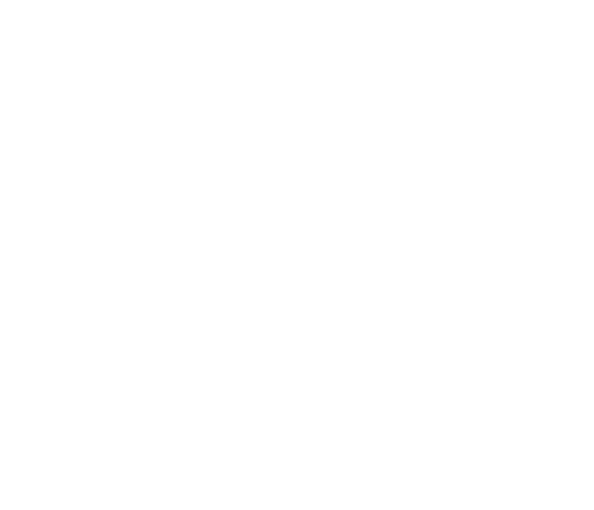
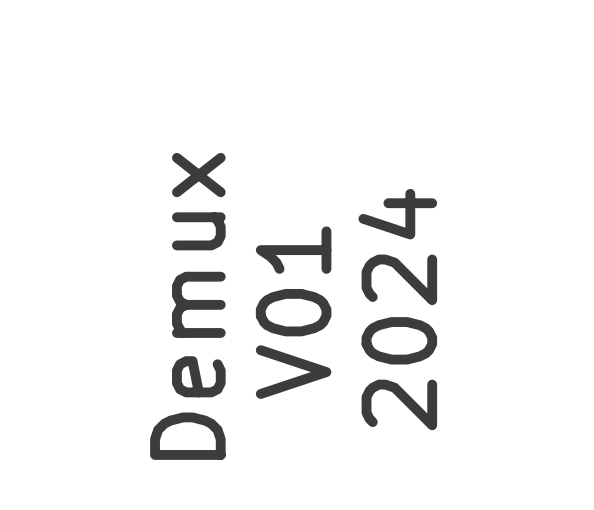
text: none -> Demux (187, 306)
text: none -> 2024 (397, 309)
text: none -> V01 (293, 312)

